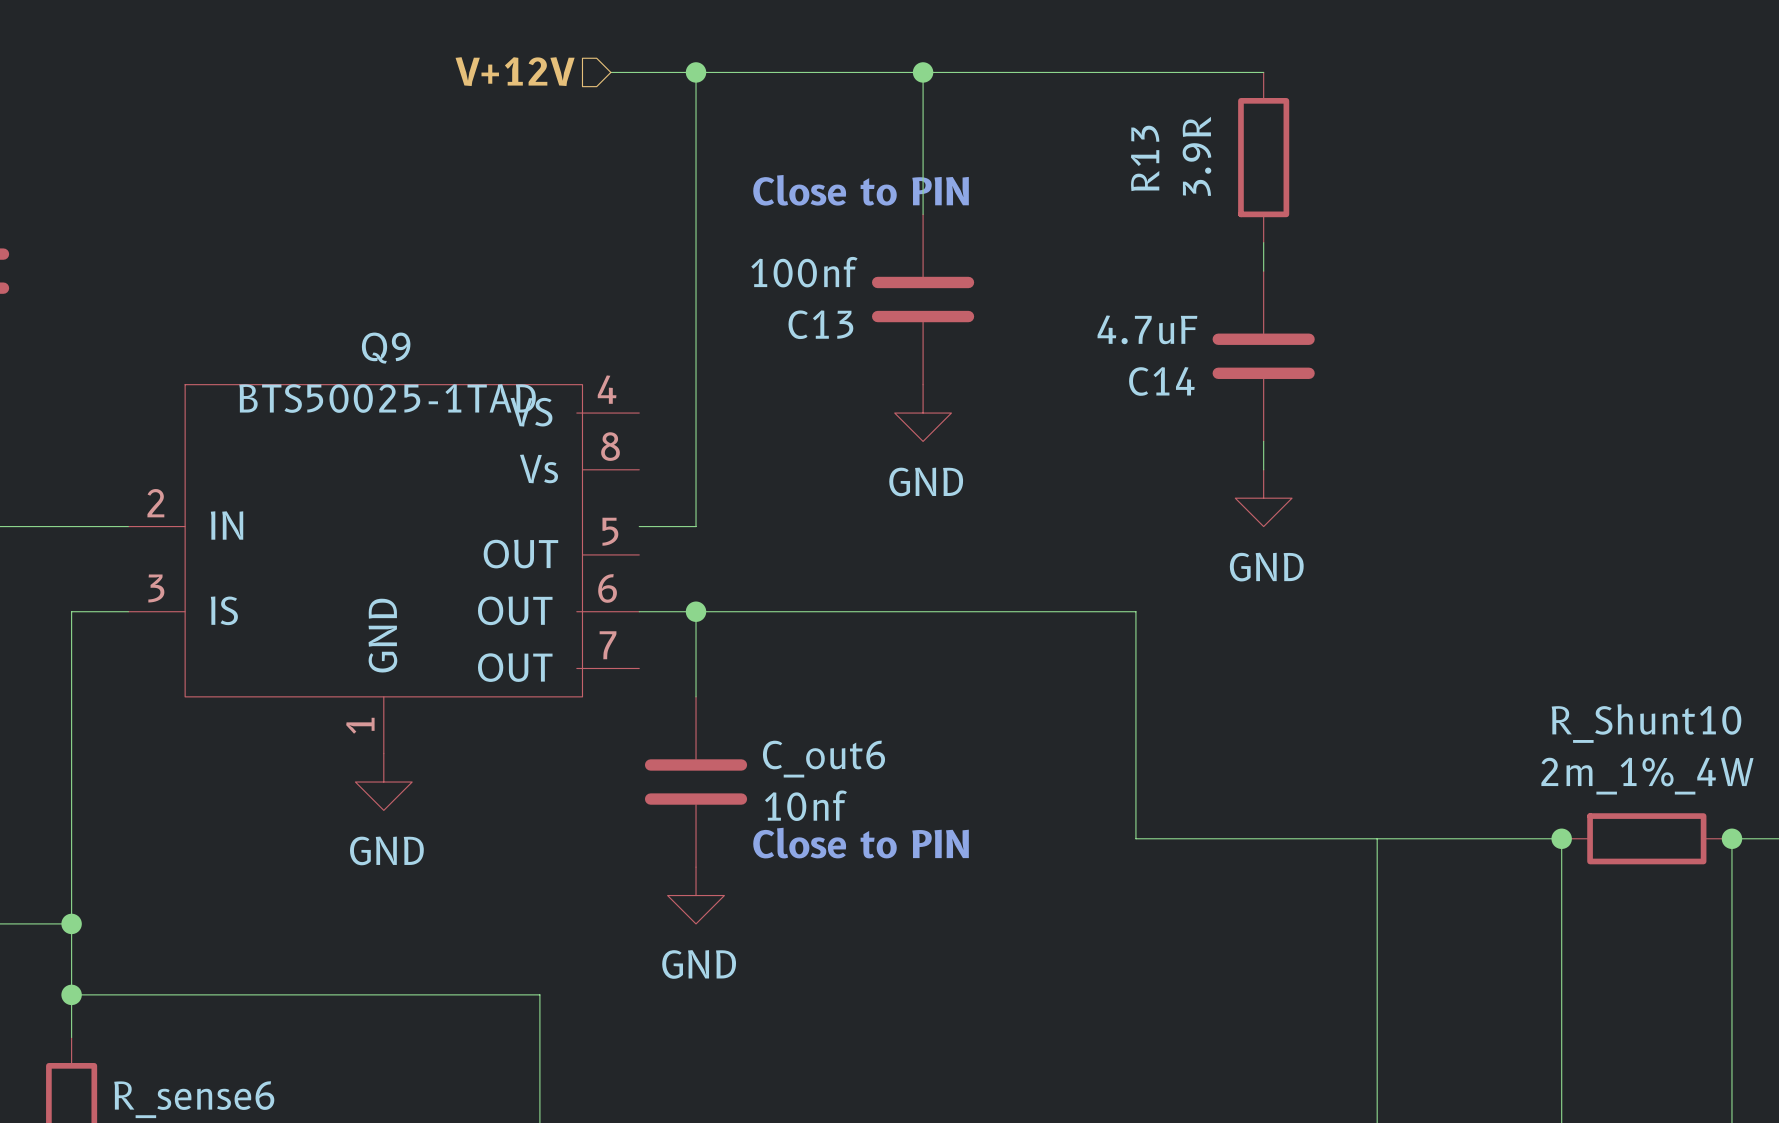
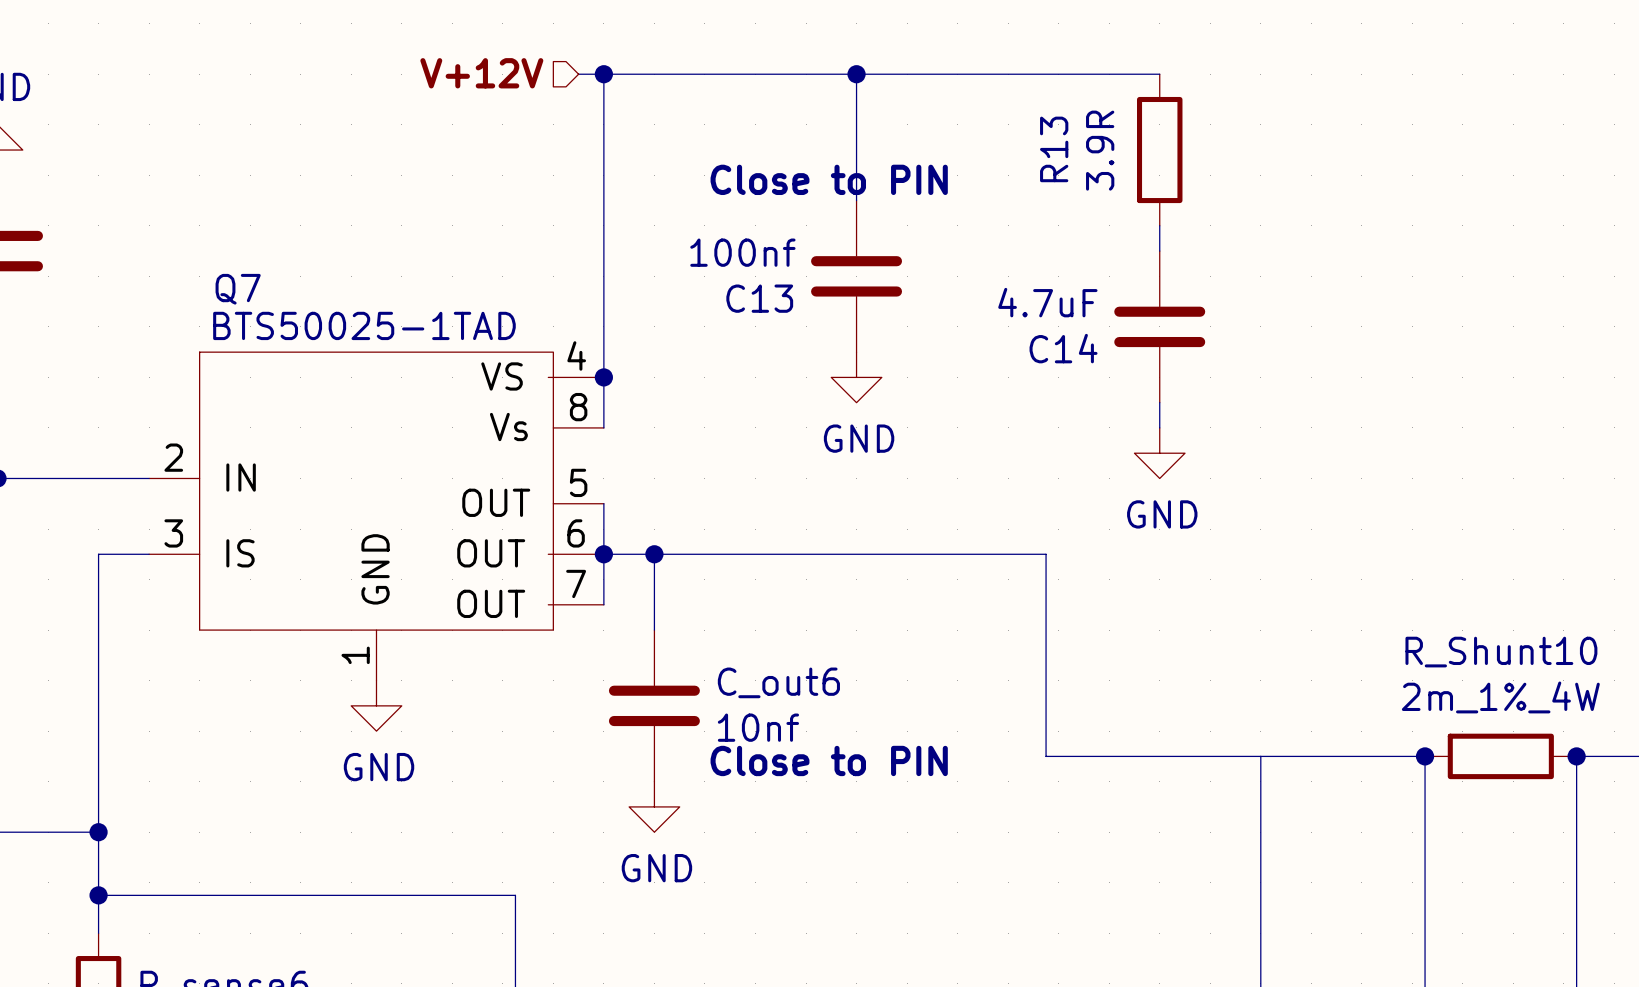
wire: none -> (603, 74) (603, 427)
wire: (696, 72) (696, 526) (639, 526) -> none
junction position: (696, 72) -> (603, 74)
Q9 name: Q9 (386, 348) -> Q7 (238, 289)
Q9 value position: BTS50025-1TAD (387, 398) -> BTS50025-1TAD (364, 325)
junction: none -> (603, 377)
wire: none -> (603, 503) (603, 604)
junction: none -> (603, 554)

